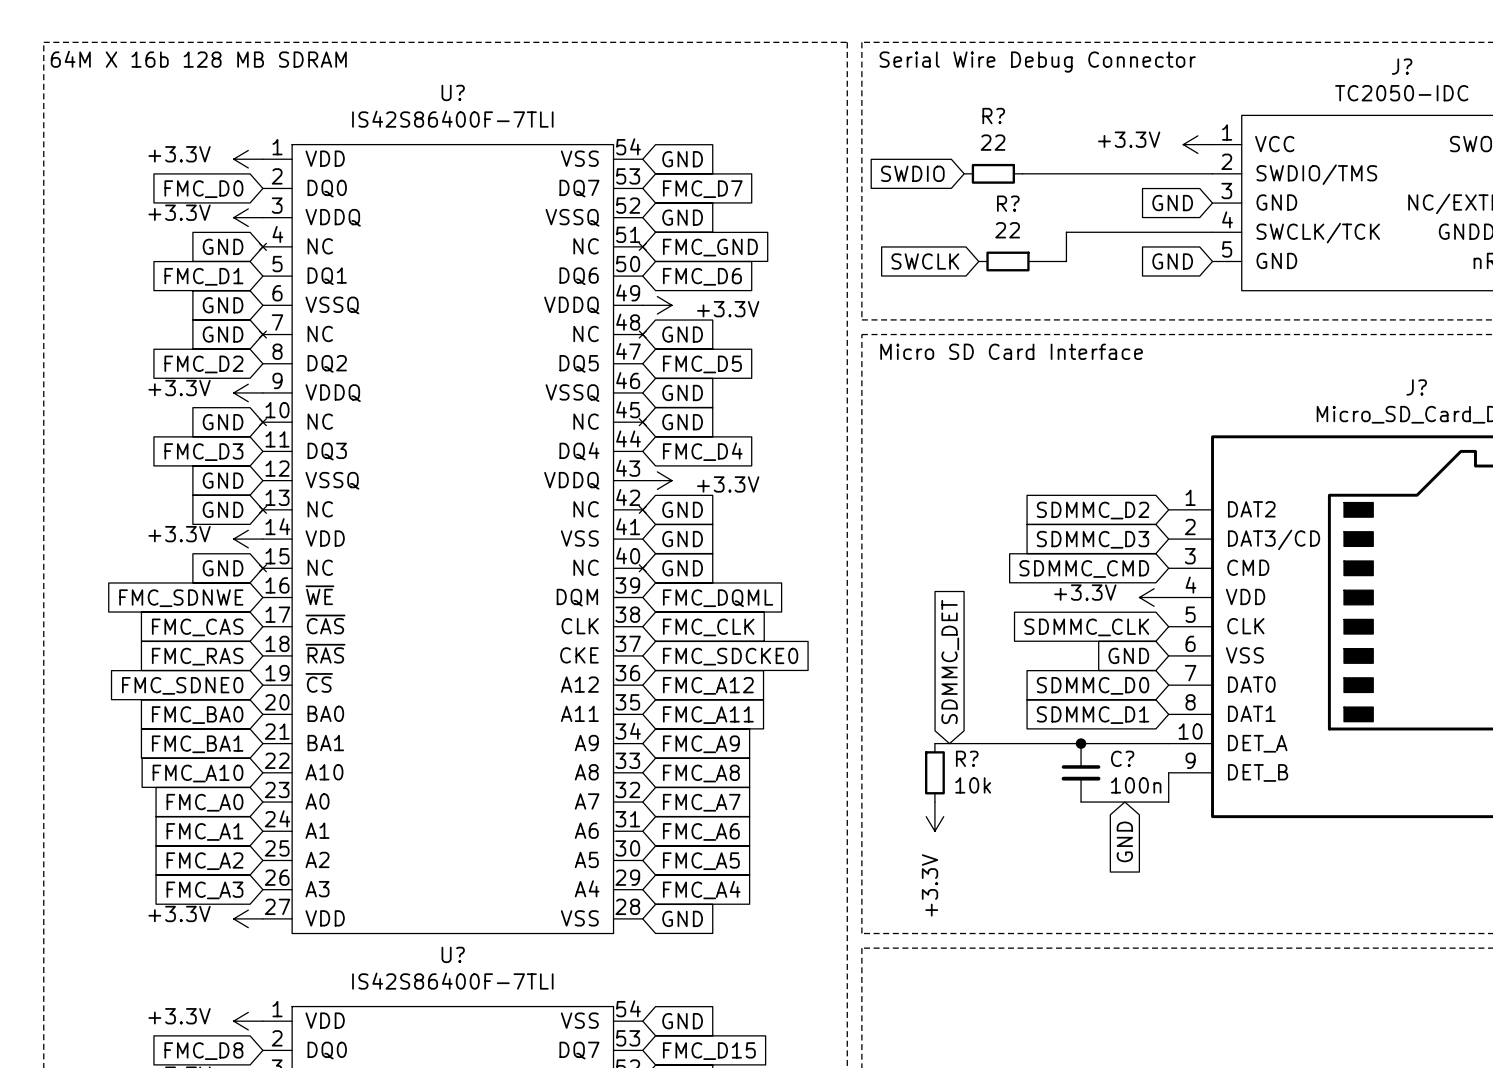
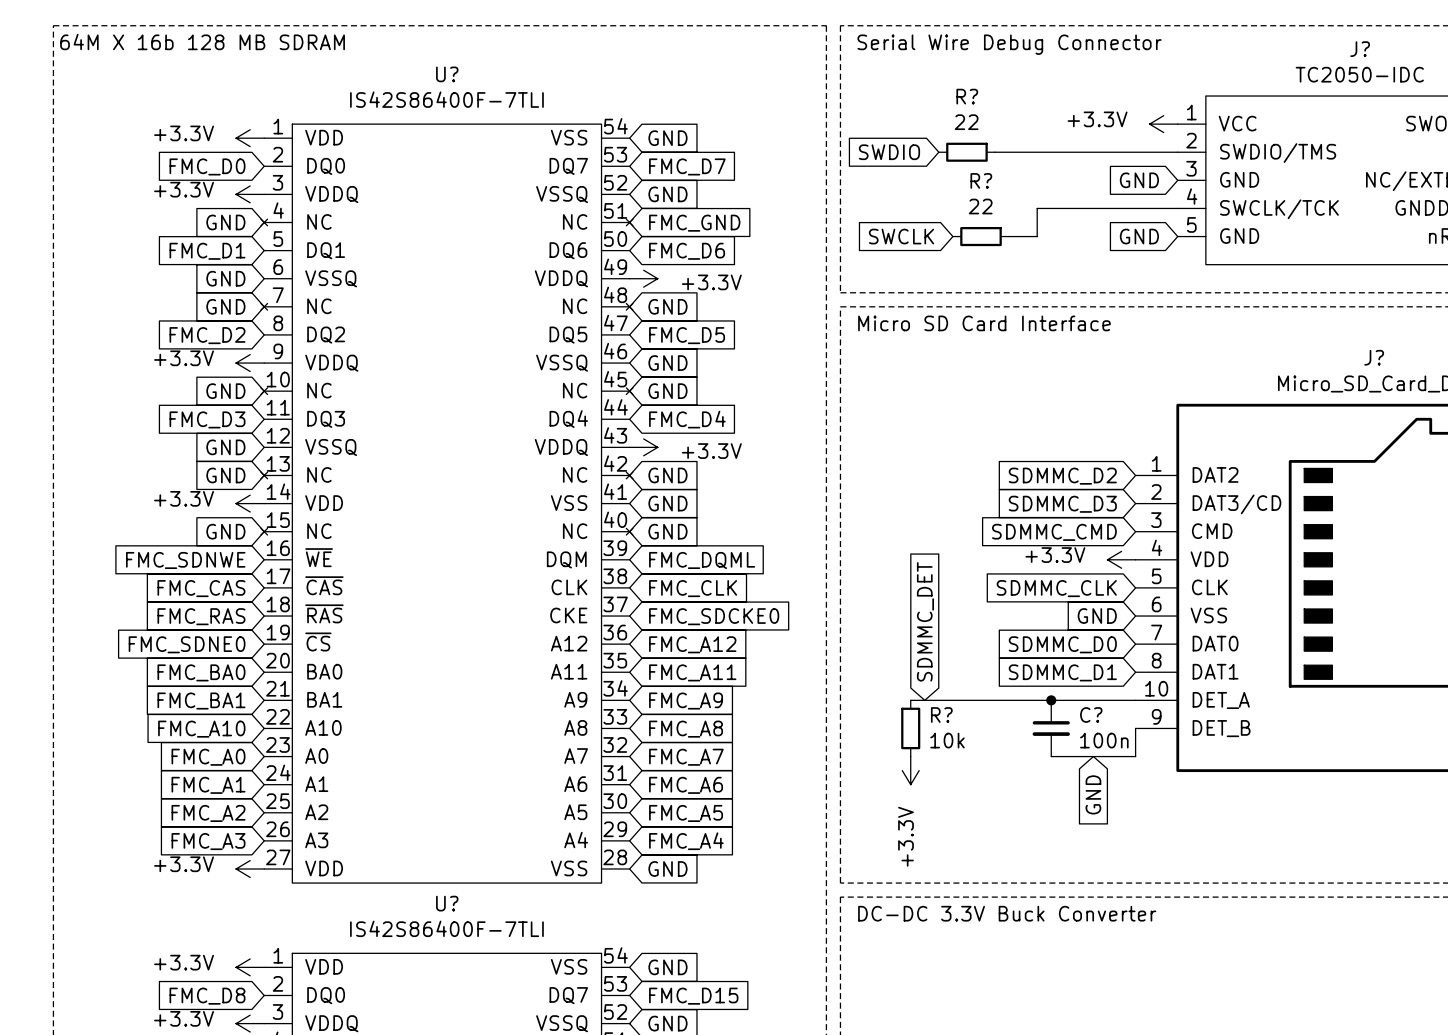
text: none -> DC-DC 3.3V Buck Converter (1007, 913)

